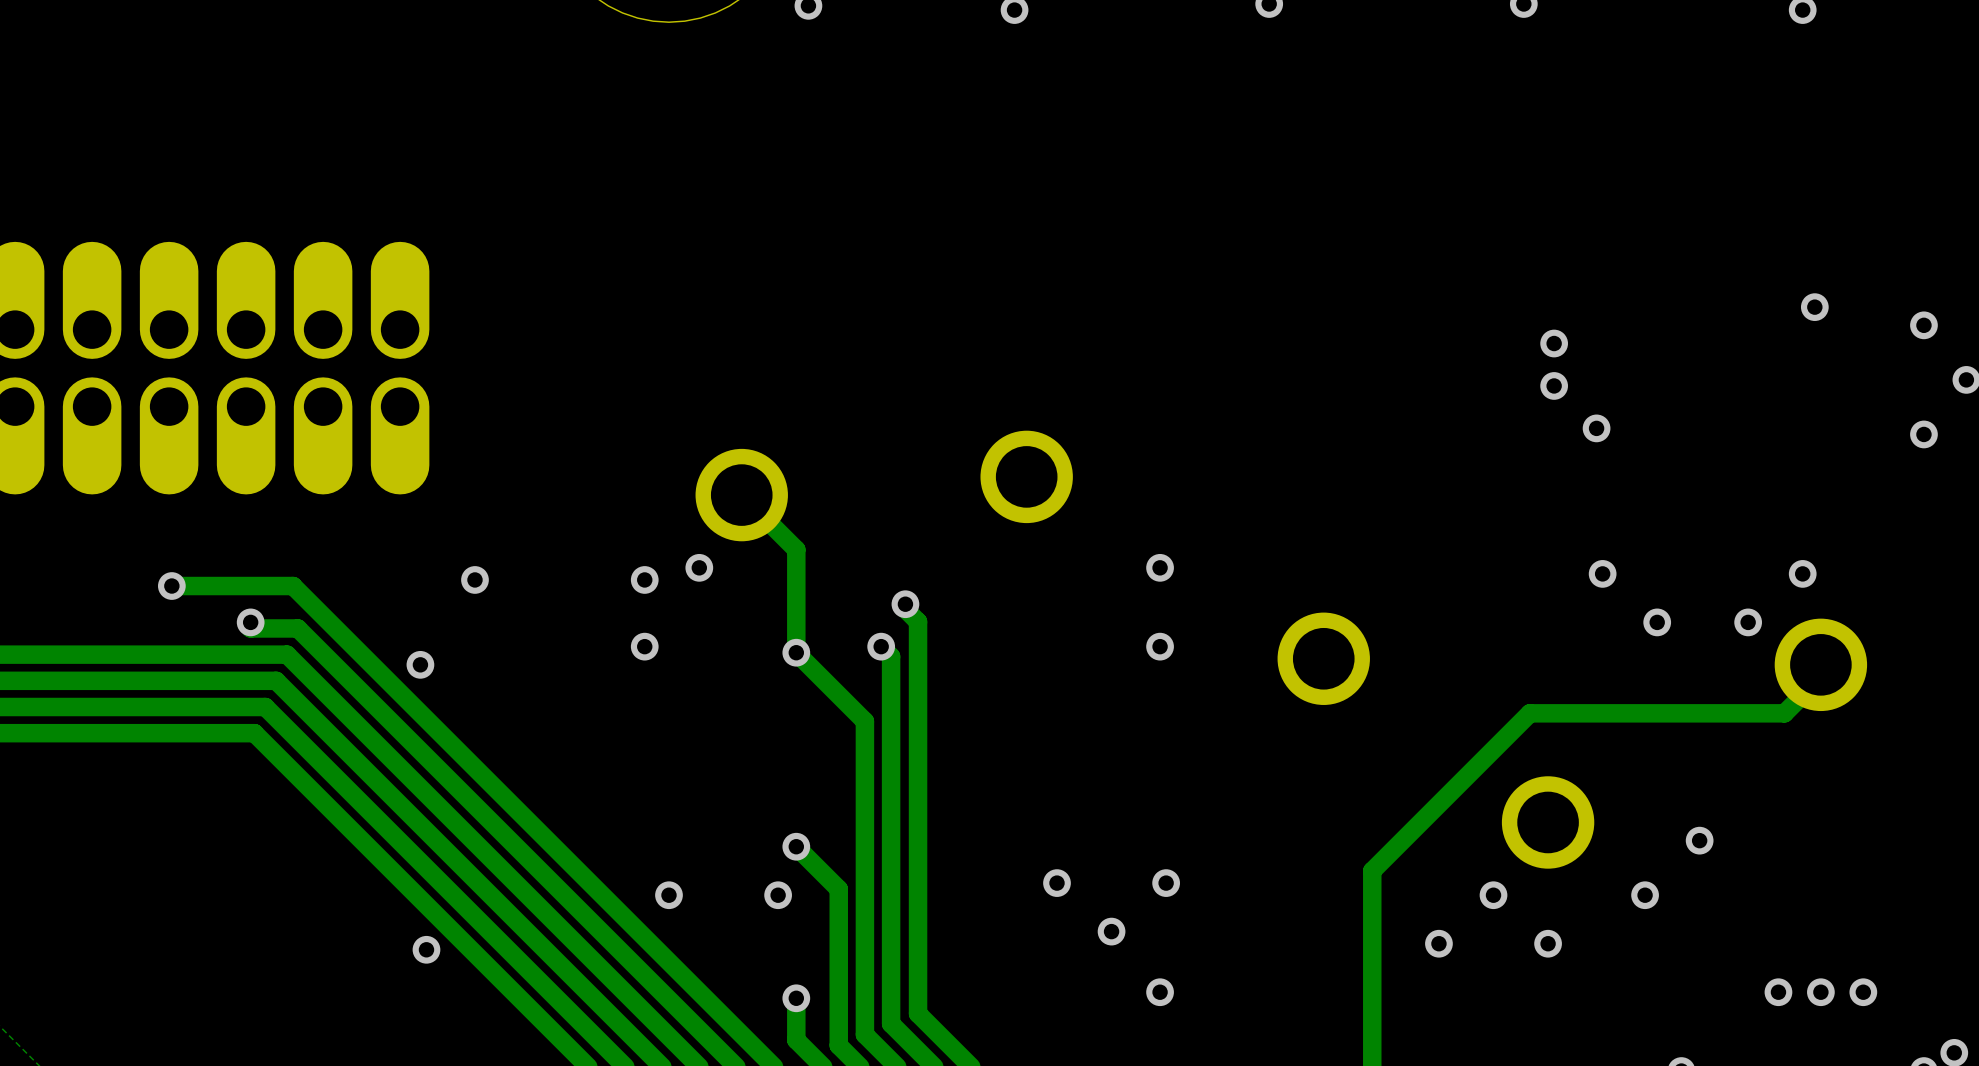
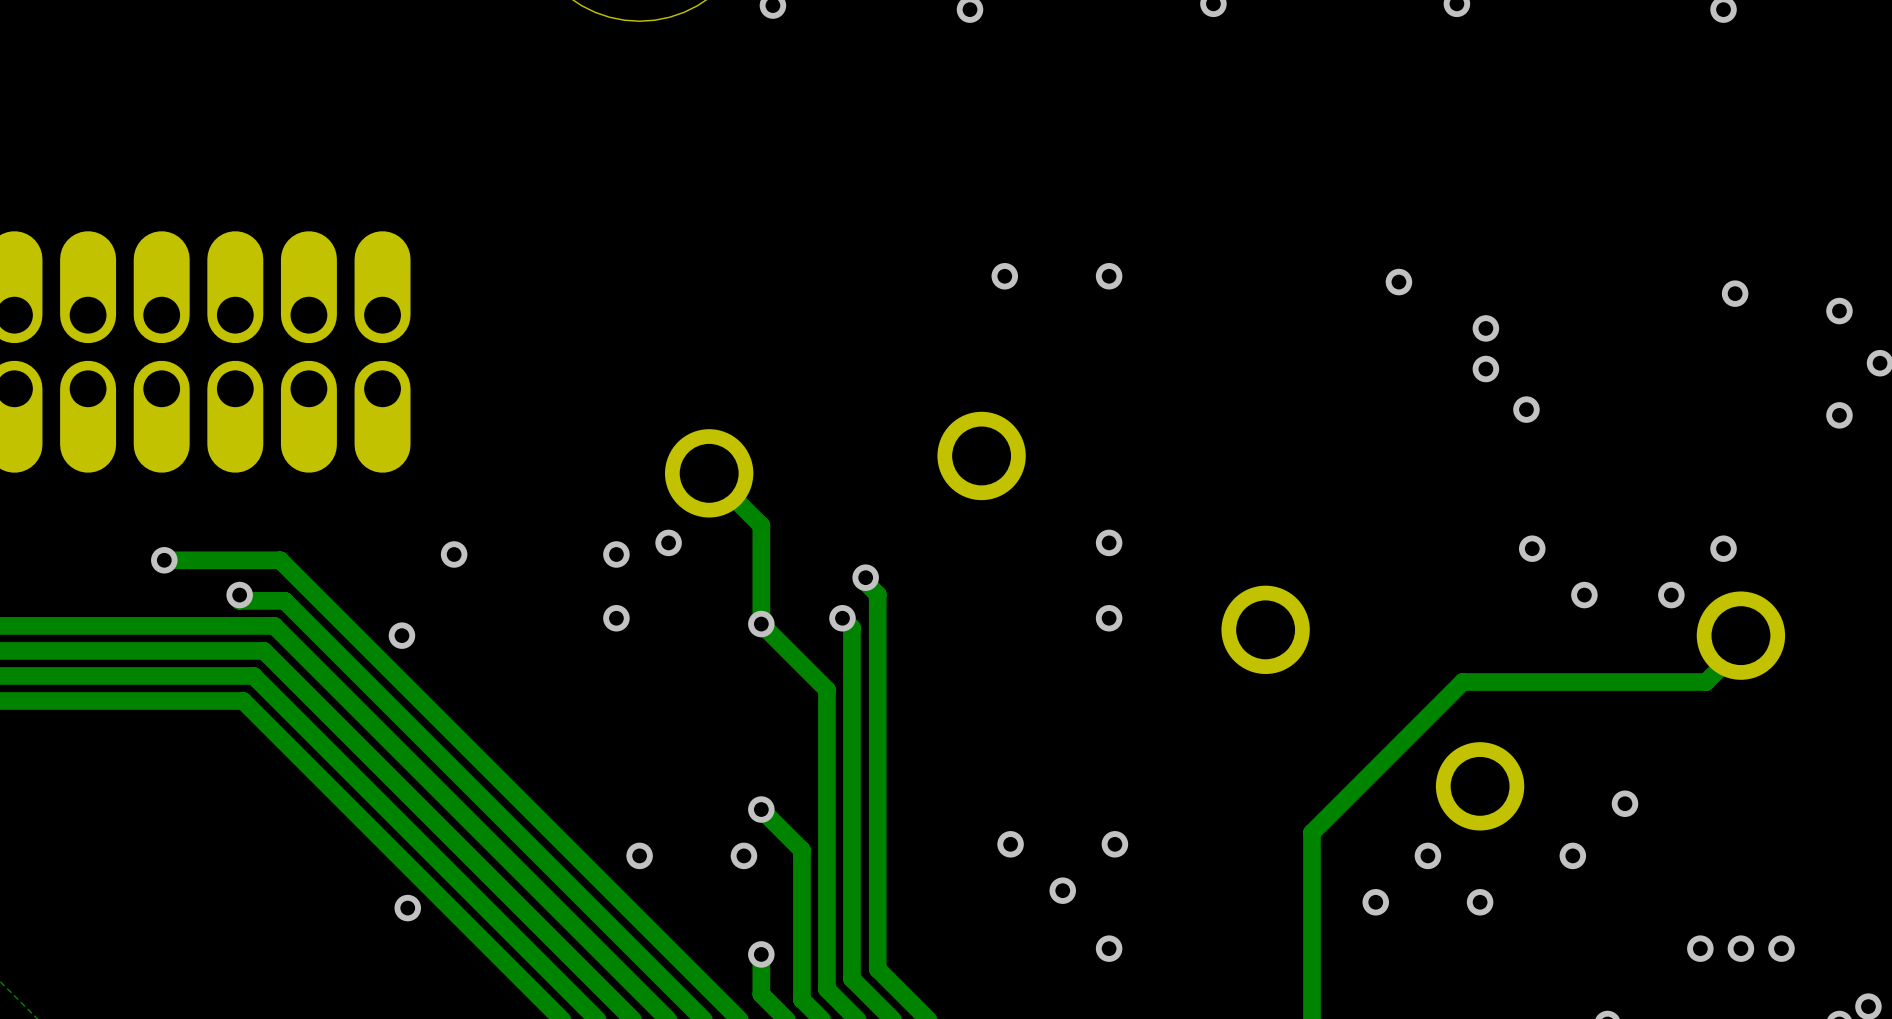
via: none -> (1004, 276)
via: none -> (1109, 276)
via: none -> (1398, 282)

